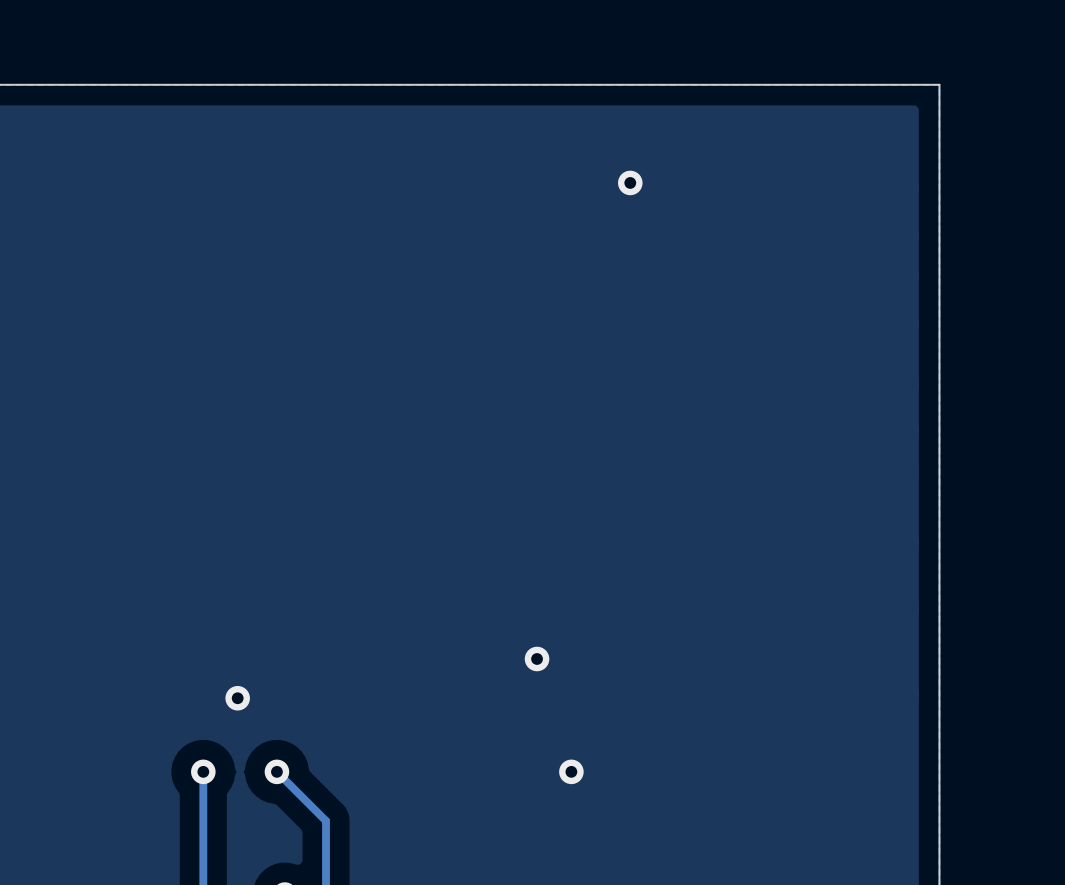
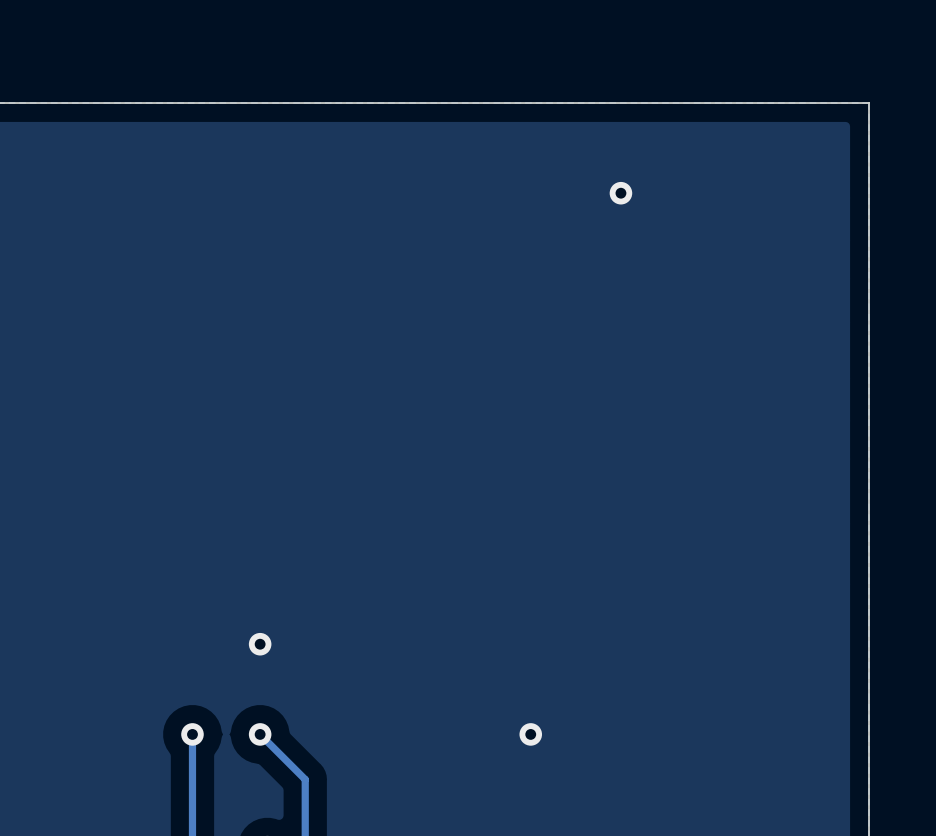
via position: (630, 182) -> (620, 193)
via: (537, 658) -> none
via position: (237, 698) -> (260, 644)

